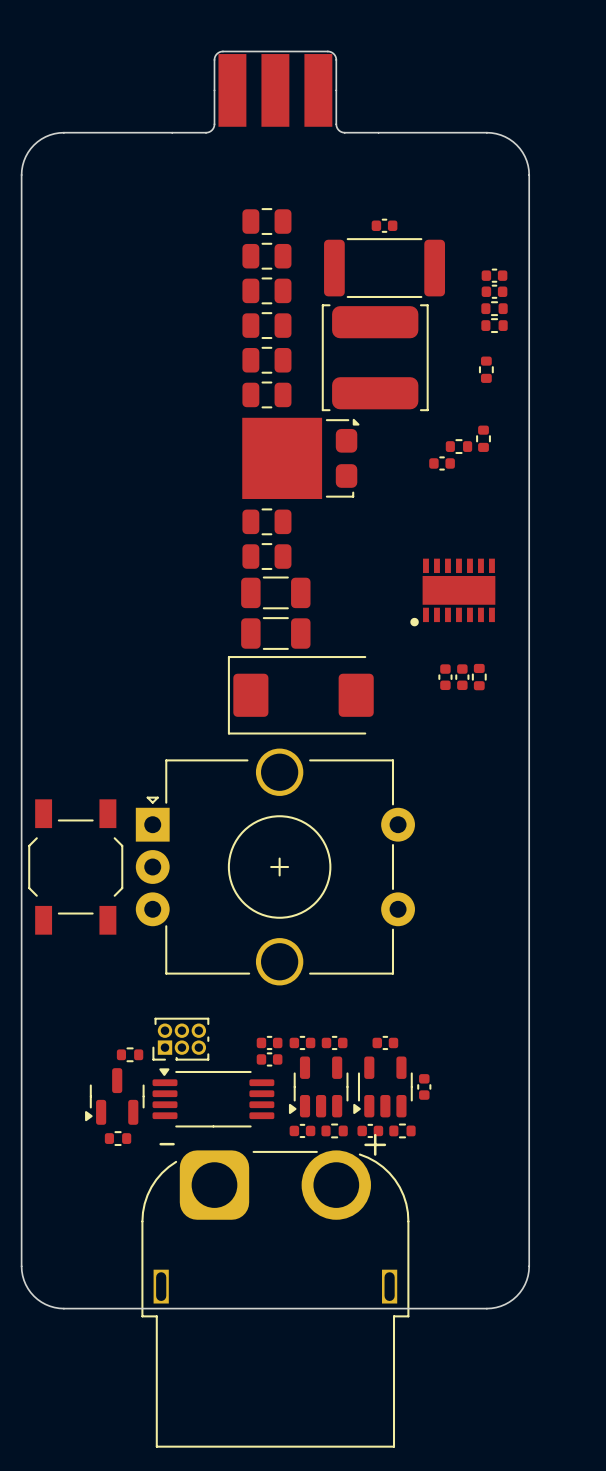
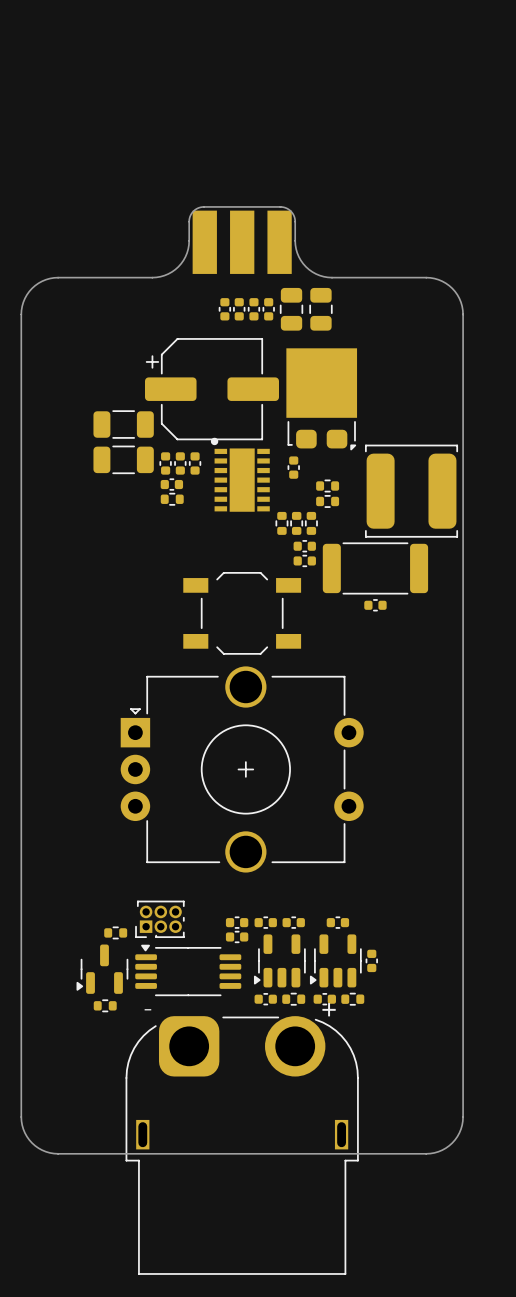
part: (275, 90) -> none
part: (266, 221) -> none
part: (384, 225) -> none
part footprint: [242, 242, 292, 270] -> [192, 210, 292, 274]
part position: (384, 268) -> (375, 568)
part: (494, 275) -> none
part: (266, 290) -> none
part: (494, 291) -> none
part: (494, 308) -> none
part: (266, 325) -> none
part: (494, 325) -> none
part: none -> (224, 309)
part: none -> (239, 309)
part: none -> (253, 309)
part: none -> (268, 309)
part: none -> (291, 309)
part: none -> (320, 309)
board edge: (21, 344) (21, 175) (23, 161) (28, 152) (41, 139) (59, 132) (210, 131) (214, 124) (214, 58) (216, 53) (222, 51) (327, 51) (333, 53) (336, 59) (336, 125) (342, 132) (491, 132) (505, 136) (516, 145) (525, 156) (528, 170) (529, 344) -> (21, 314) (23, 302) (29, 291) (38, 283) (49, 278) (152, 277) (171, 271) (181, 263) (187, 252) (190, 215) (196, 209) (203, 206) (286, 208) (294, 218) (297, 252) (303, 263) (312, 271) (332, 277) (434, 278) (445, 283) (455, 291) (461, 302) (463, 314)
part rotation: 0° (375, 357) -> 90° clockwise (411, 491)
part position: (375, 357) -> (411, 491)
part: (266, 360) -> none
part: (486, 369) -> none
part: (266, 394) -> none
part: none -> (212, 389)
part: (483, 438) -> none
part: (458, 446) -> none
part rotation: 0° (300, 458) -> 90° clockwise (321, 399)
part: (442, 463) -> none
part: none -> (123, 424)
part footprint: [242, 508, 292, 536] -> [210, 437, 270, 512]
part: none -> (123, 459)
part: none -> (165, 463)
part: none -> (180, 463)
part: none -> (195, 463)
part: none -> (293, 467)
part: none -> (171, 484)
part: none -> (327, 486)
part: none -> (172, 499)
part: (266, 556) -> none
part: none -> (327, 501)
part: none -> (281, 523)
part: none -> (296, 523)
part: none -> (311, 523)
part: (275, 592) -> none
part: (452, 592) -> none
part: none -> (304, 546)
part: none -> (304, 560)
part: (275, 633) -> none
part: (445, 677) -> none
part: (462, 677) -> none
part: (479, 677) -> none
part: none -> (375, 605)
part: (300, 695) -> none
part rotation: 0° (75, 867) -> 90° clockwise (242, 613)
part position: (75, 867) -> (242, 613)

